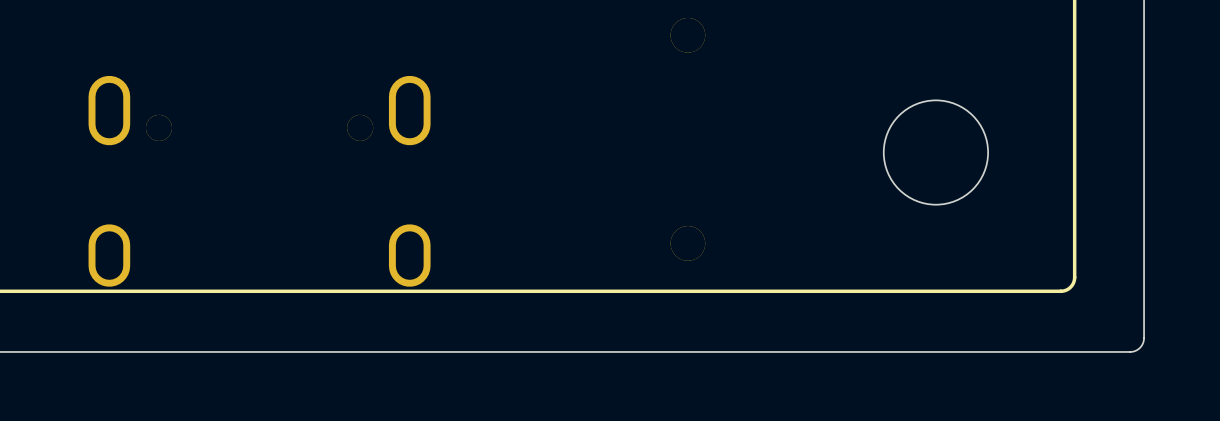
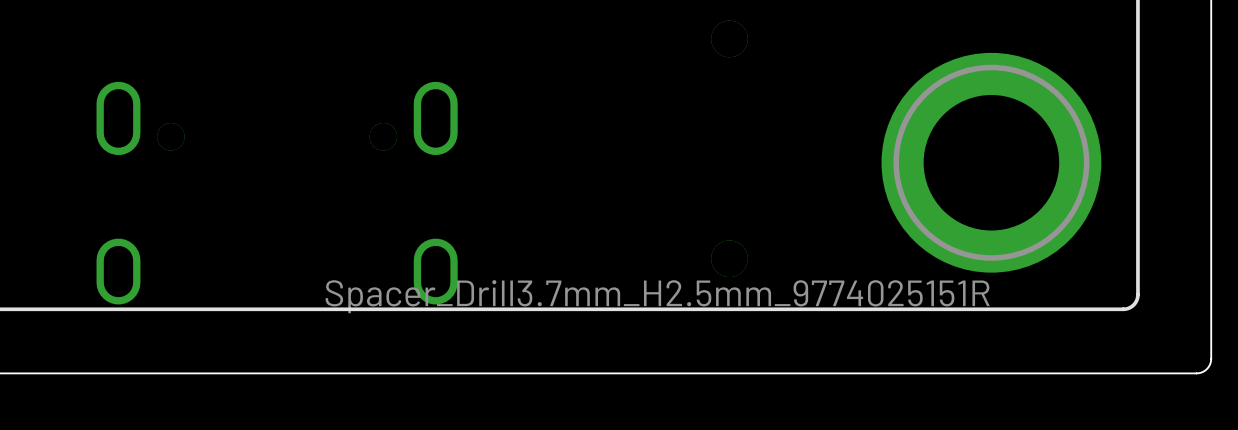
round board edge: [882, 99, 989, 206] -> none
part: none -> Spacer_Drill3.7mm_H2.5mm_9774025151R (991, 162)

